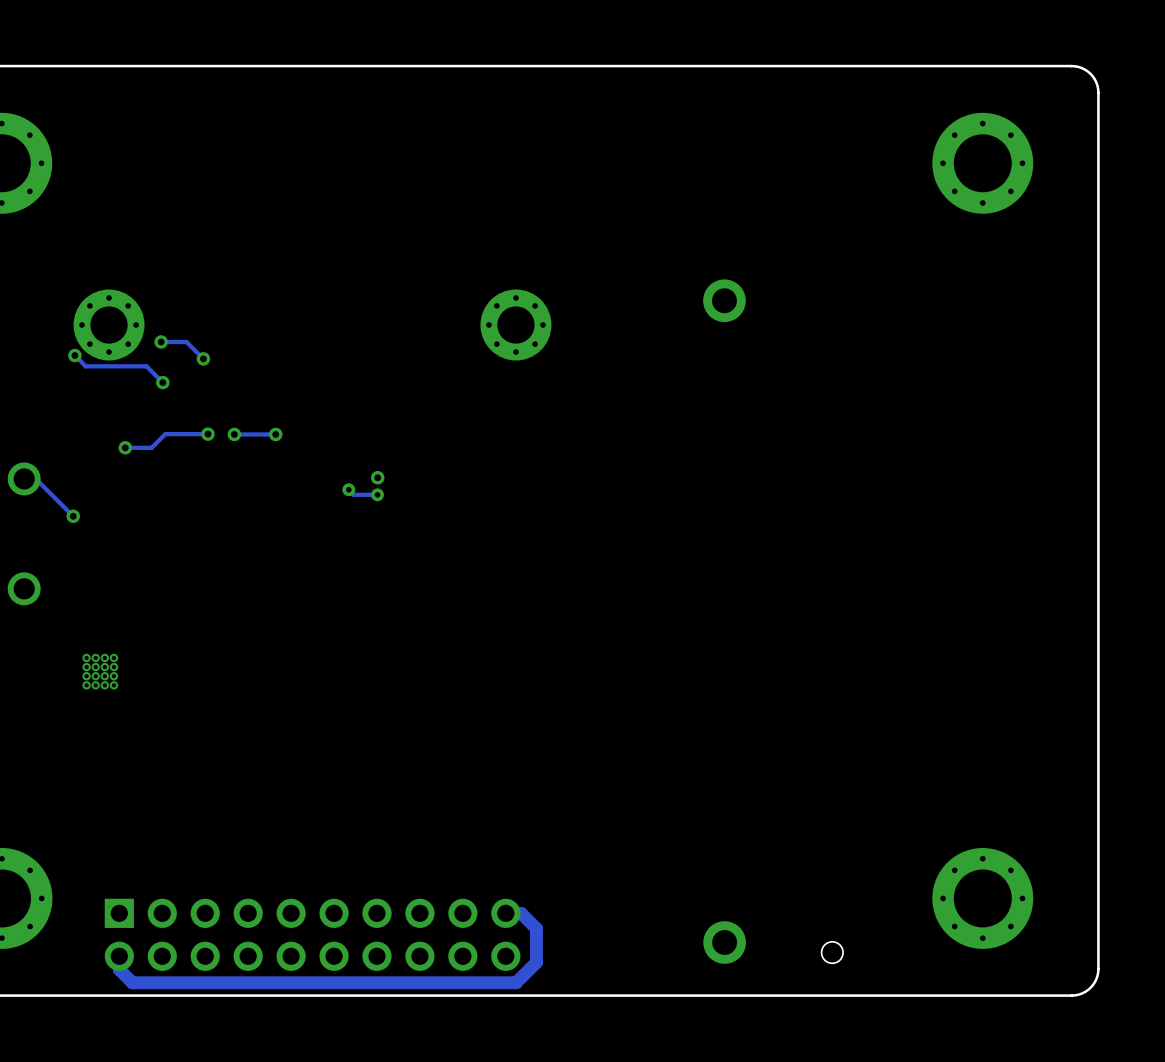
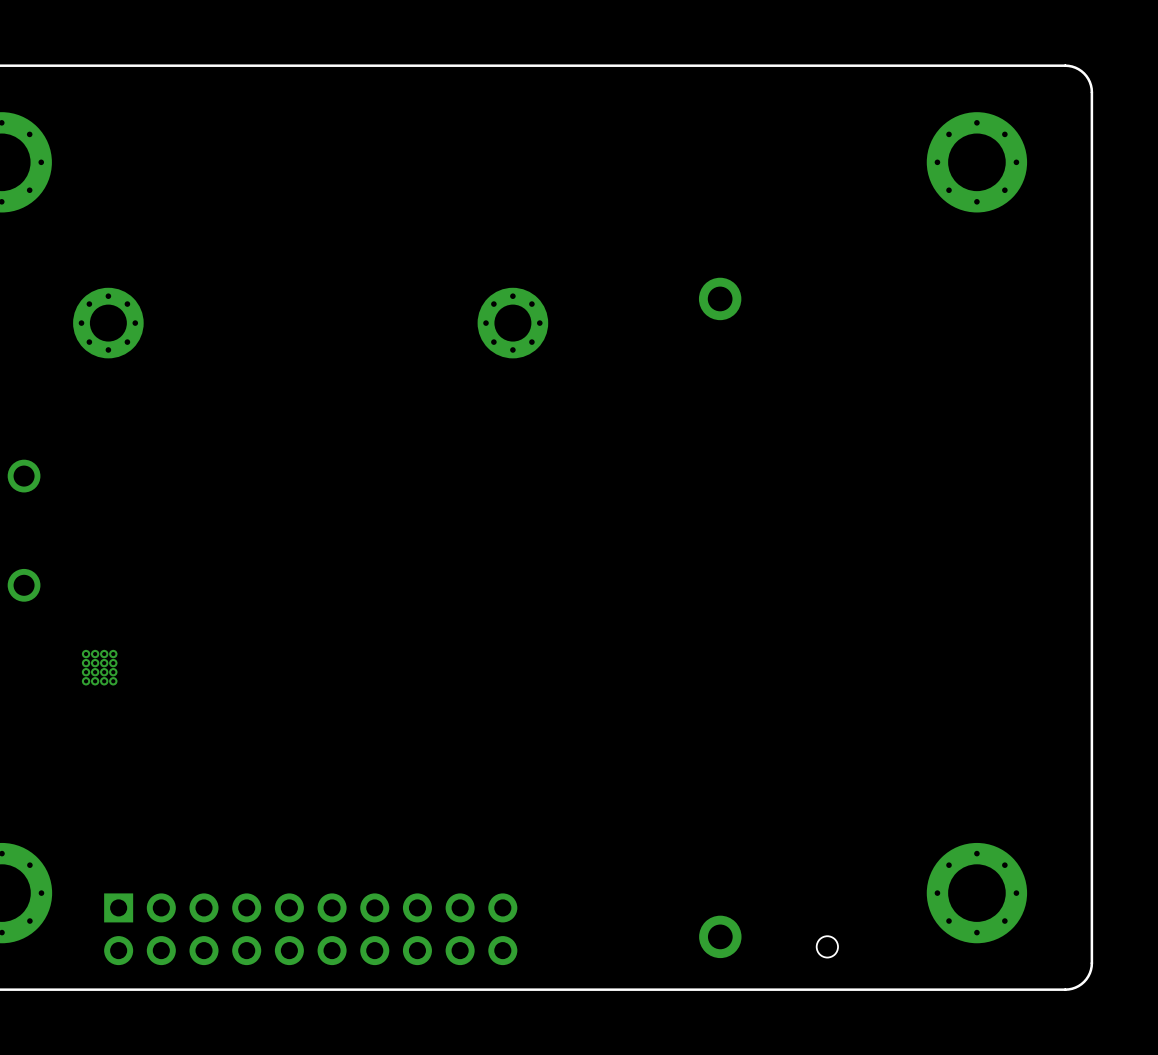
track: (161, 341) (186, 341) (203, 358) -> none
via: (161, 341) -> none
track: (74, 355) (85, 366) (146, 366) (162, 382) -> none
via: (74, 355) -> none
via: (203, 358) -> none
via: (162, 382) -> none
track: (207, 434) (165, 434) (151, 447) (125, 447) -> none
via: (207, 434) -> none
via: (234, 434) -> none
track: (275, 434) (234, 434) -> none
via: (275, 434) -> none
via: (125, 447) -> none
via: (377, 477) -> none
track: (24, 478) (35, 478) (73, 516) -> none
track: (348, 489) (353, 494) (377, 494) -> none
via: (348, 489) -> none
via: (377, 494) -> none
via: (73, 516) -> none
track: (505, 913) (521, 913) (536, 928) (536, 962) (516, 982) (132, 982) (119, 969) (119, 956) -> none

